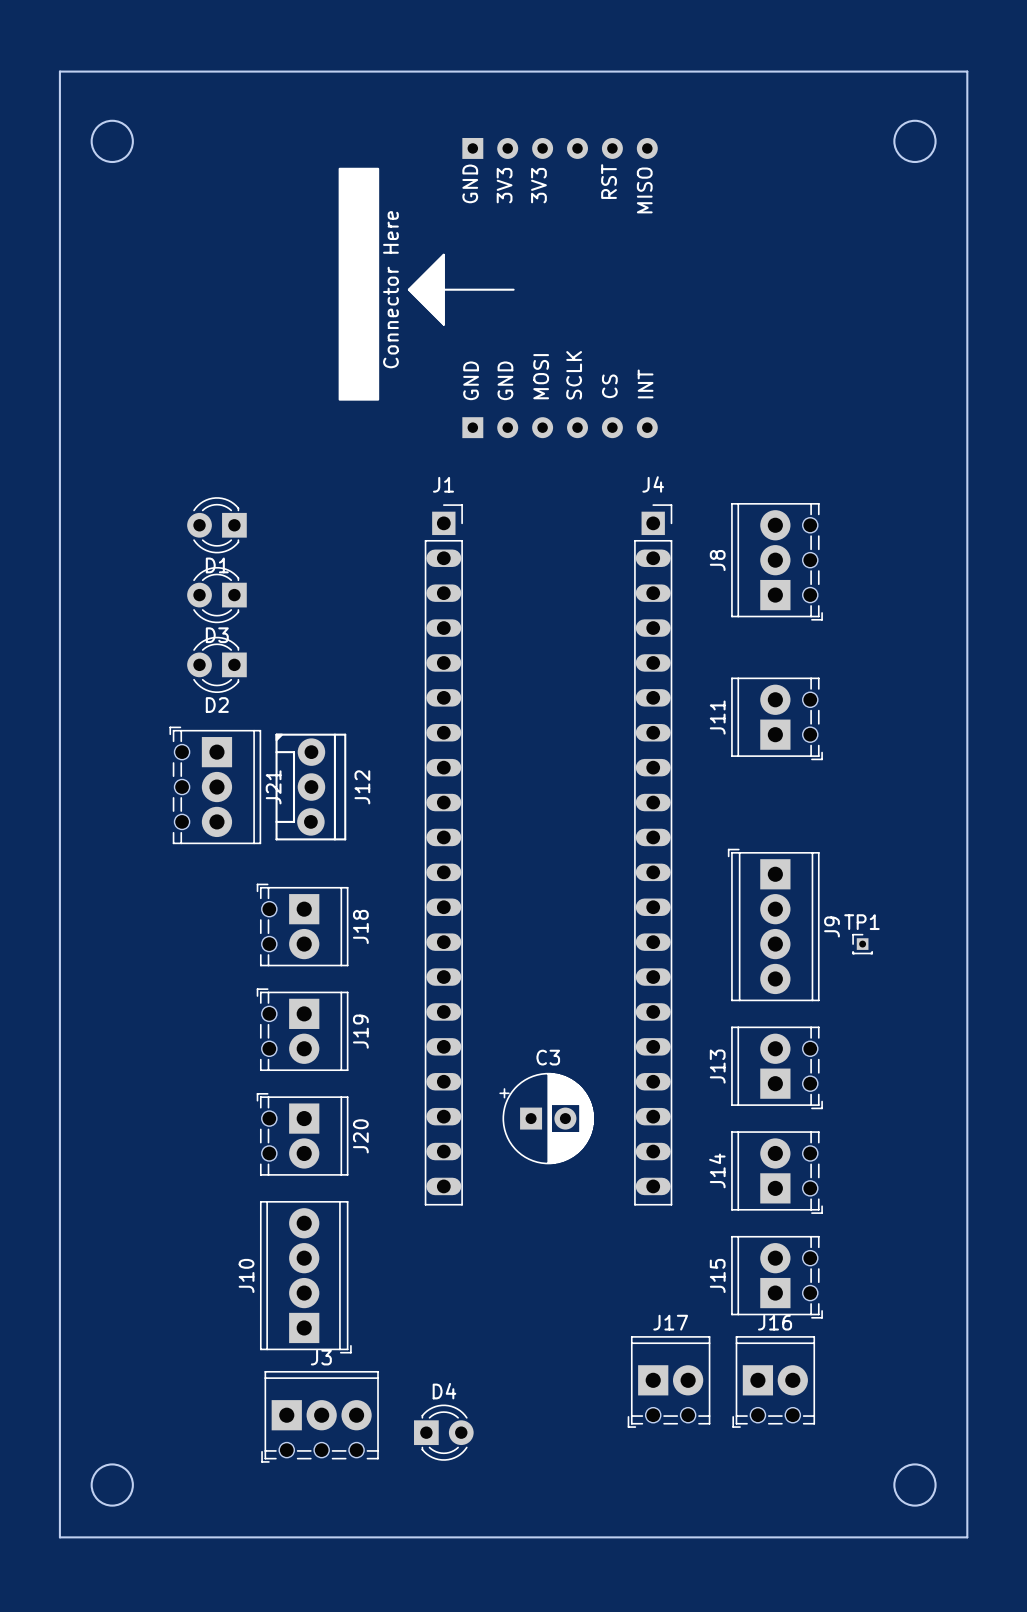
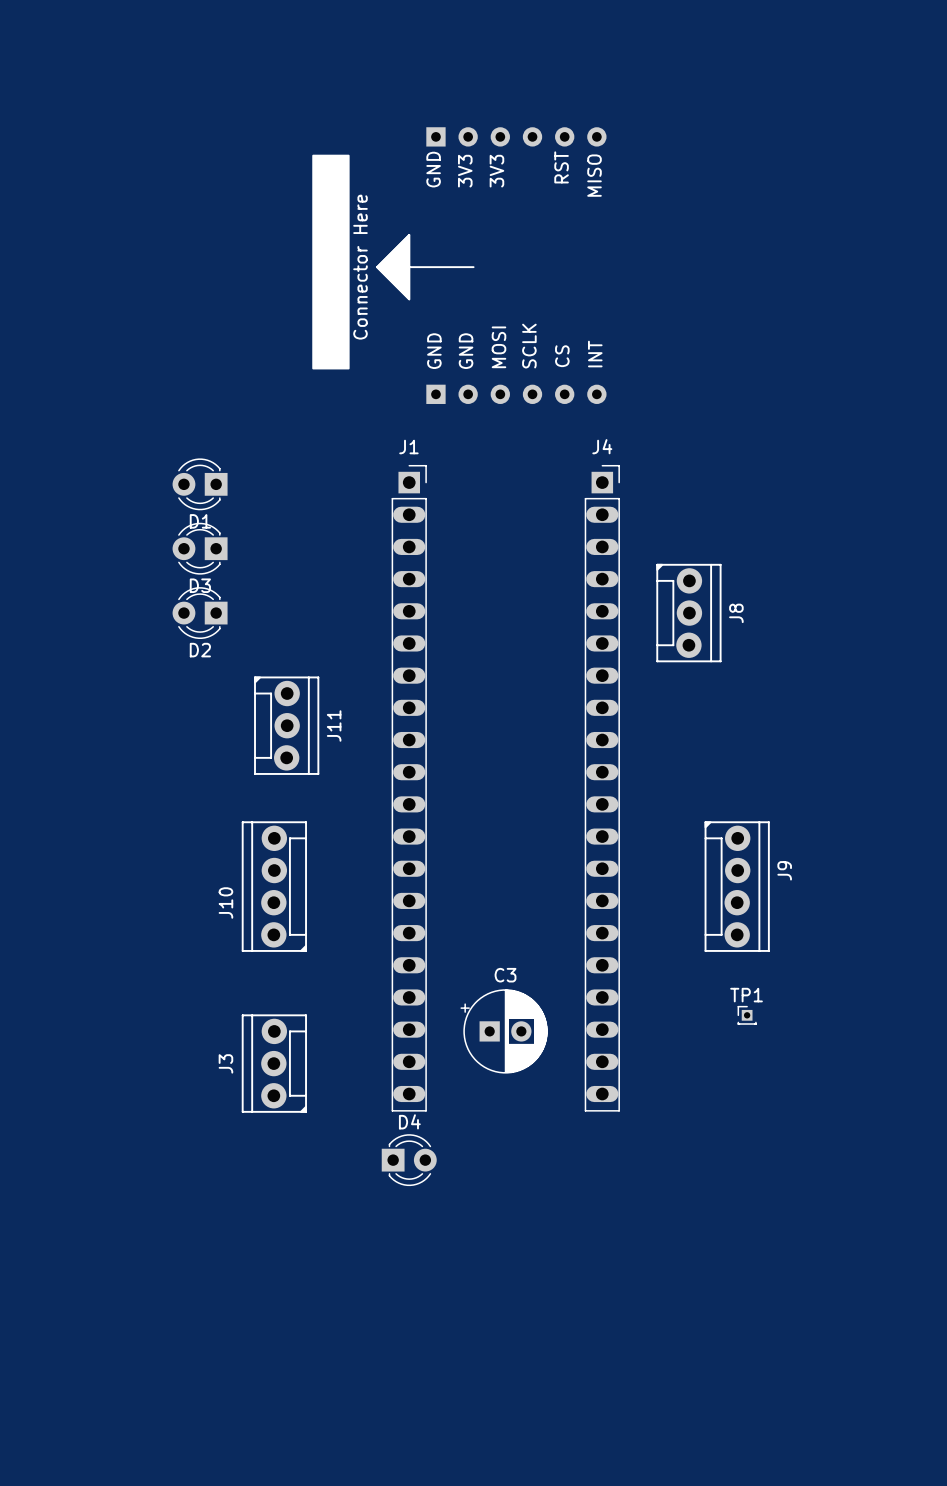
board edge: (59, 71) (59, 1537) (967, 1537) (967, 71) (59, 71) -> none
round board edge: [90, 119, 134, 164] -> none
round board edge: [893, 119, 937, 164] -> none
J8 footprint: [731, 503, 823, 621] -> [656, 563, 722, 663]
J8 name position: J8 (717, 560) -> J8 (736, 613)
J11: (777, 718) -> none
J21: (215, 785) -> none
J12 name: J12 (362, 787) -> J11 (334, 726)
J9 footprint: [727, 848, 820, 1002] -> [704, 821, 770, 952]
J18: (302, 924) -> none
TP1 position: (862, 944) -> (747, 1015)
J19: (302, 1029) -> none
J13: (777, 1067) -> none
J20: (302, 1134) -> none
J14: (777, 1172) -> none
J10 footprint: [259, 1201, 352, 1354] -> [241, 821, 307, 952]
J15: (777, 1277) -> none
J3 name position: J3 (321, 1357) -> J3 (225, 1063)
J3 footprint: [261, 1370, 379, 1463] -> [241, 1014, 307, 1113]
J17: (669, 1381) -> none
J16: (773, 1381) -> none
D4 position: (443, 1432) -> (409, 1160)
round board edge: [90, 1463, 134, 1507] -> none
round board edge: [893, 1463, 937, 1507] -> none

